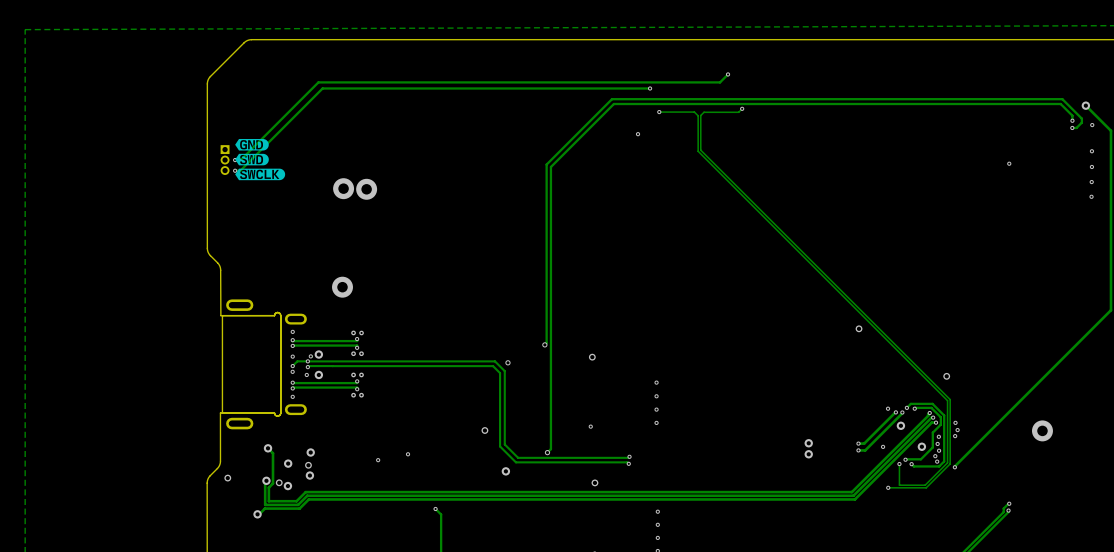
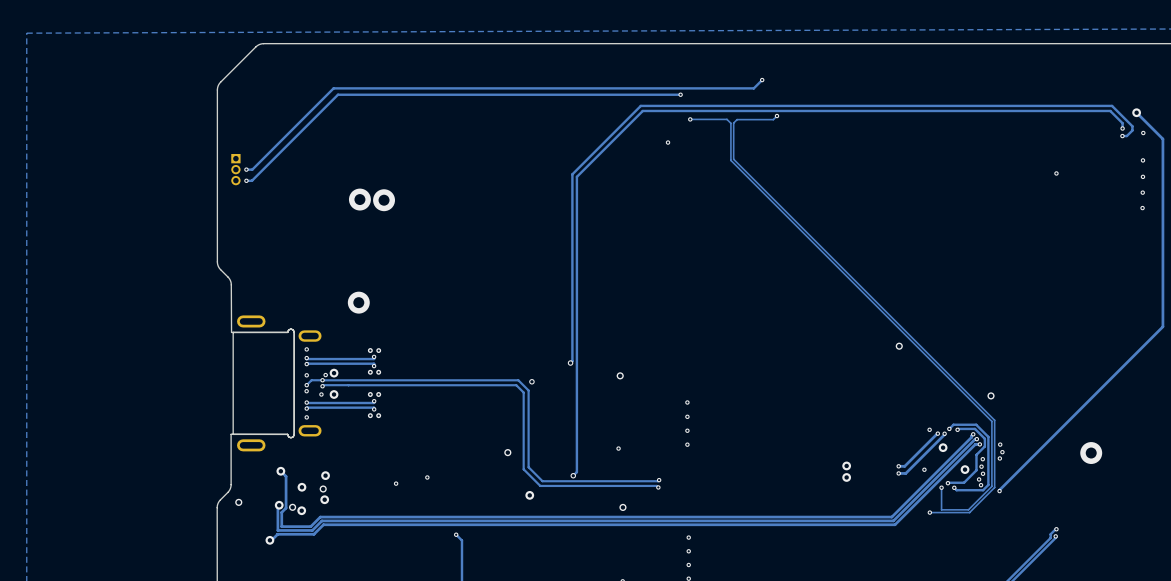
drawing: [235, 139, 286, 181] -> none

